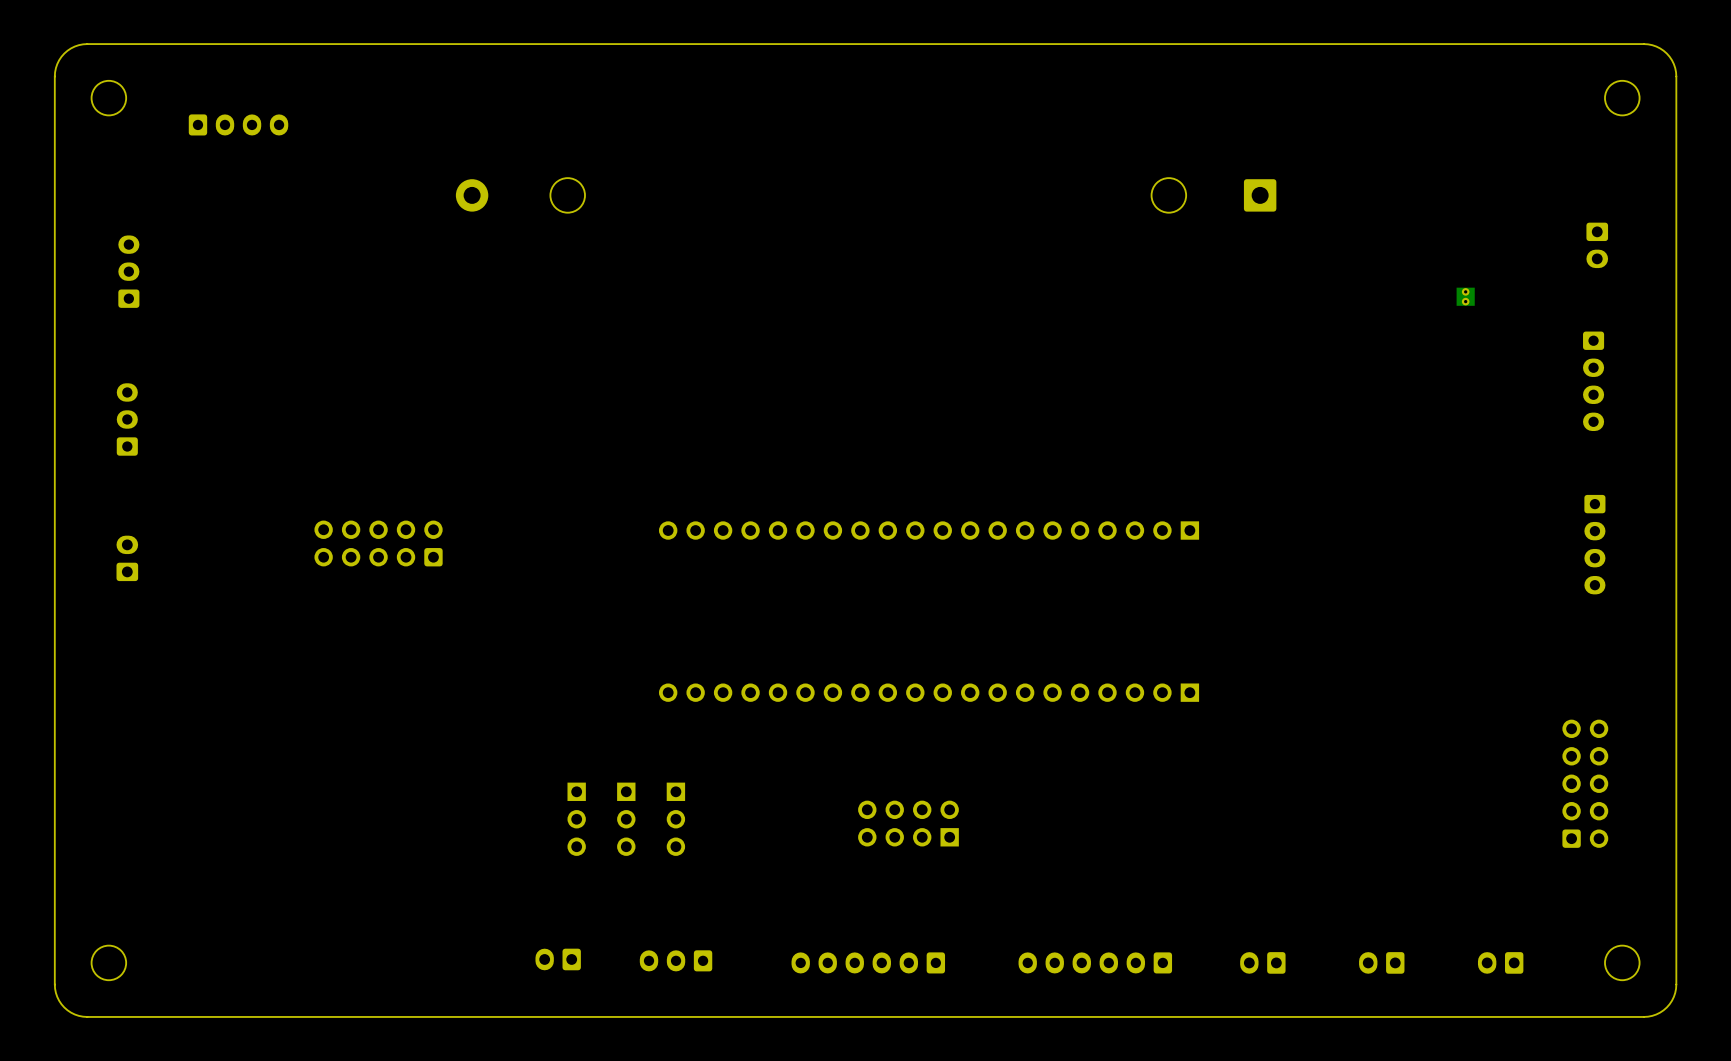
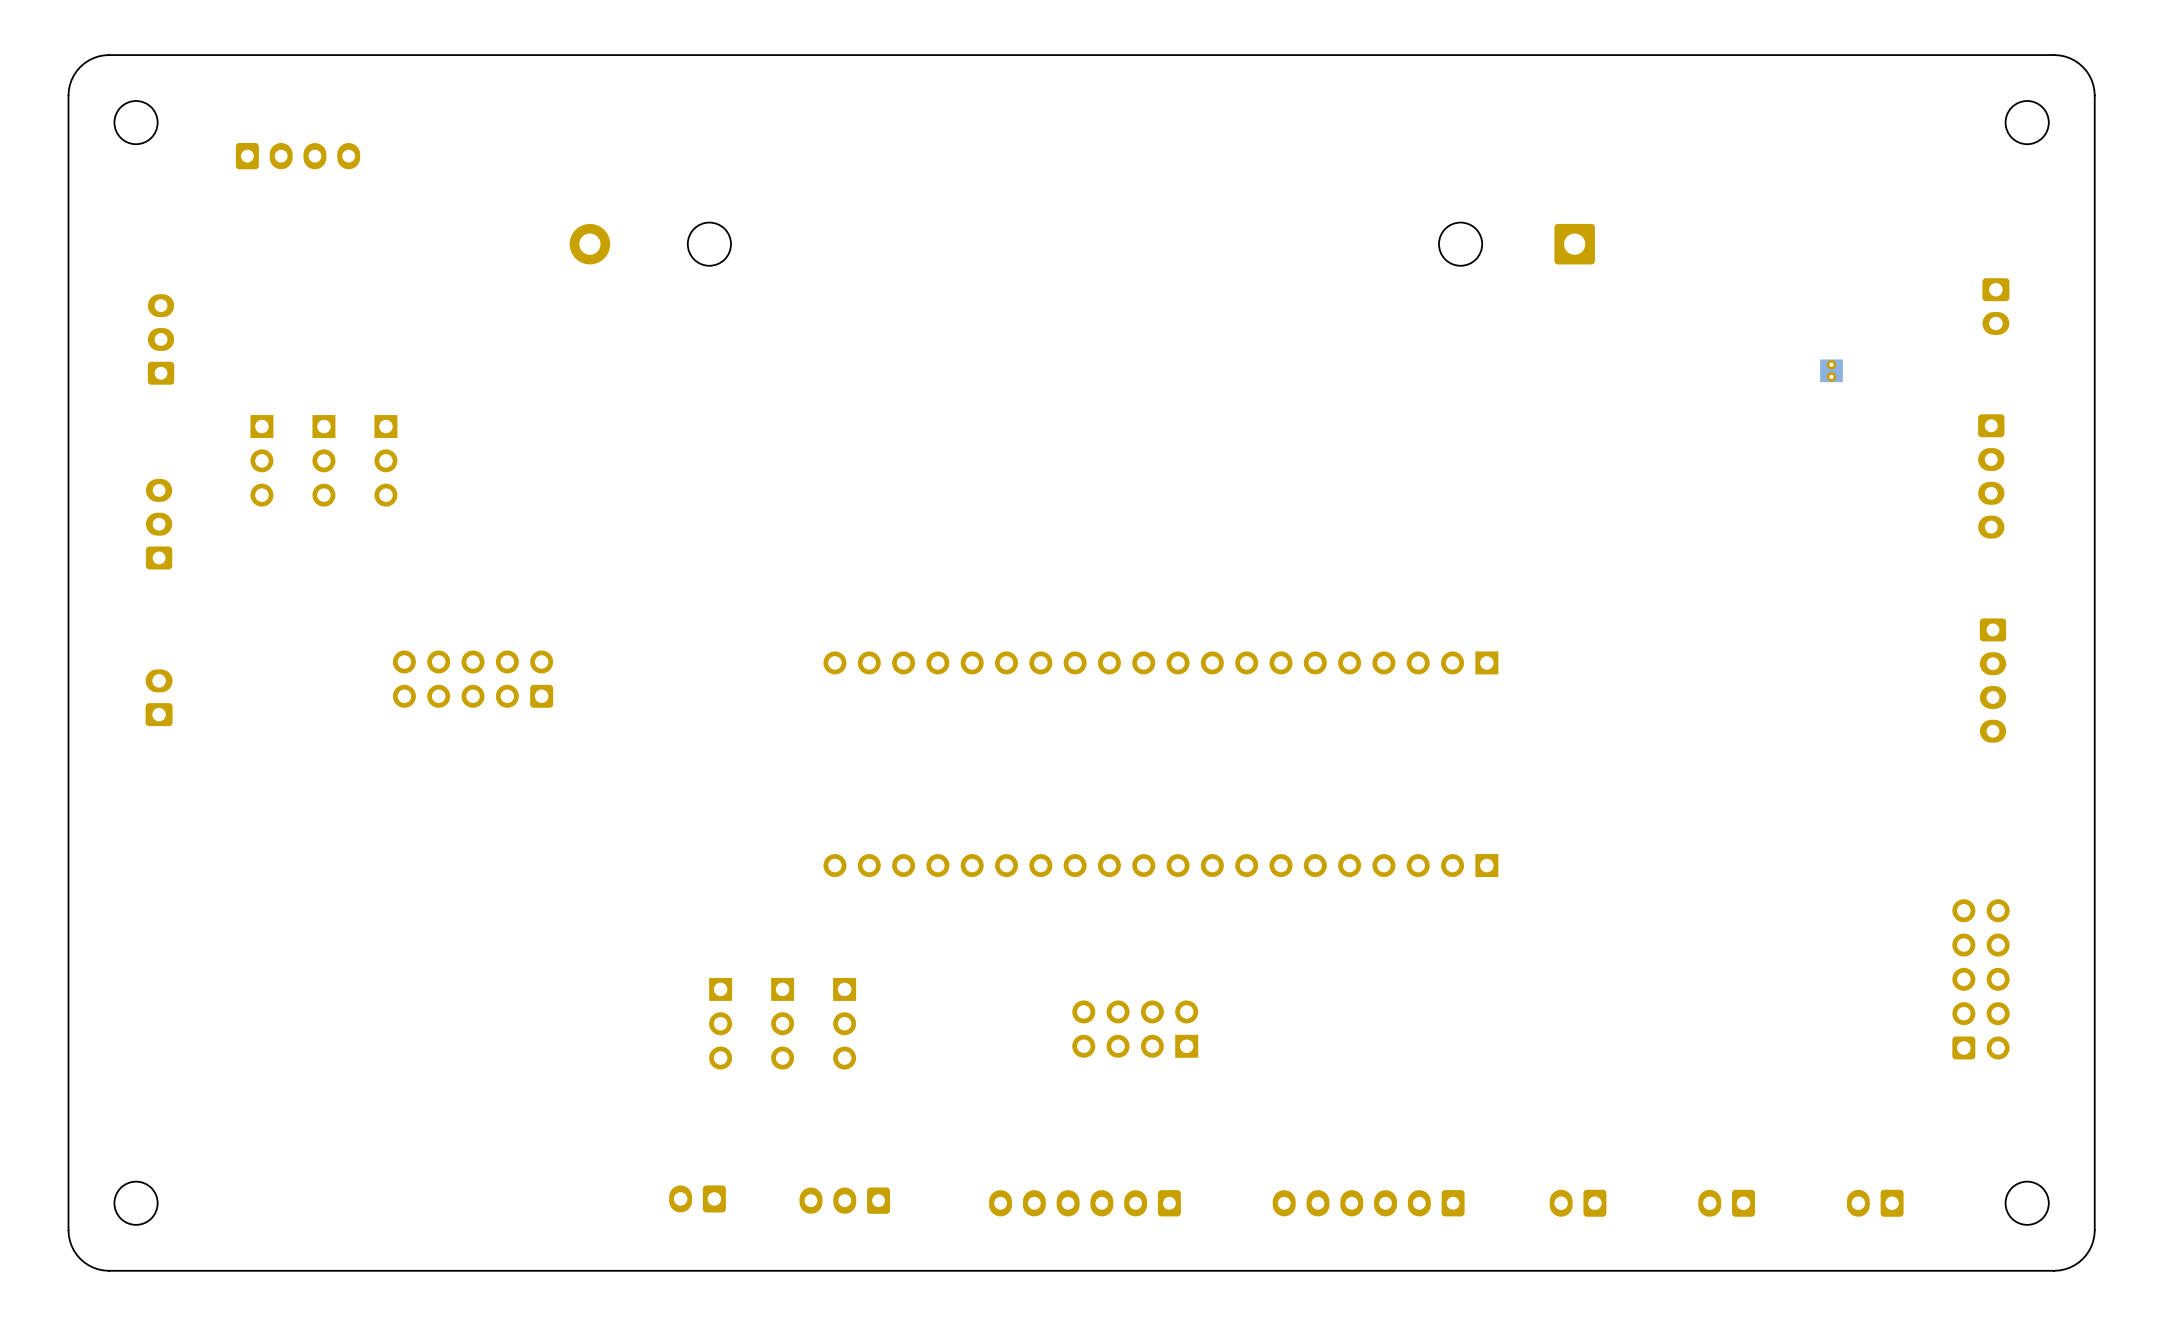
part: none -> (261, 460)
part: none -> (323, 460)
part: none -> (385, 460)

